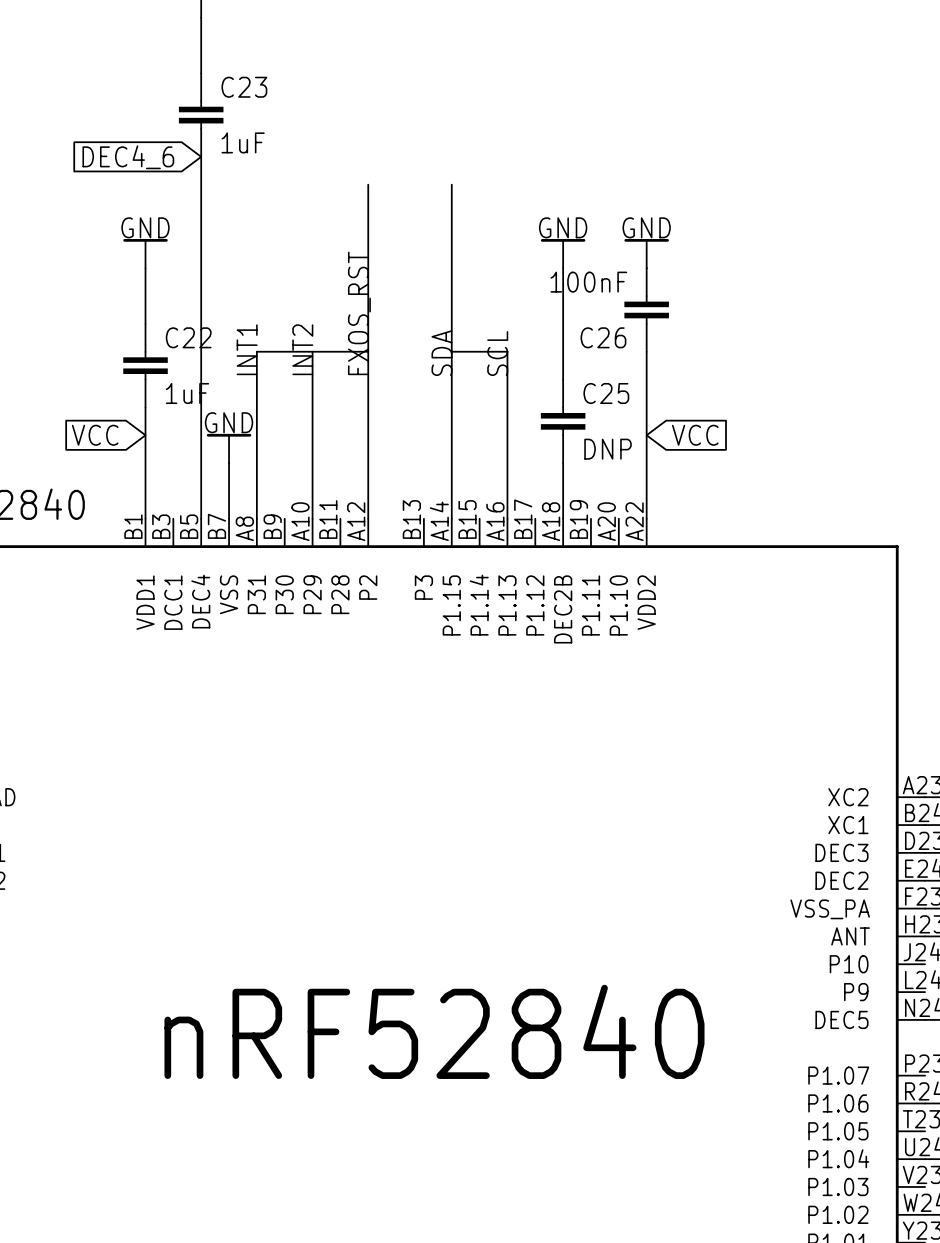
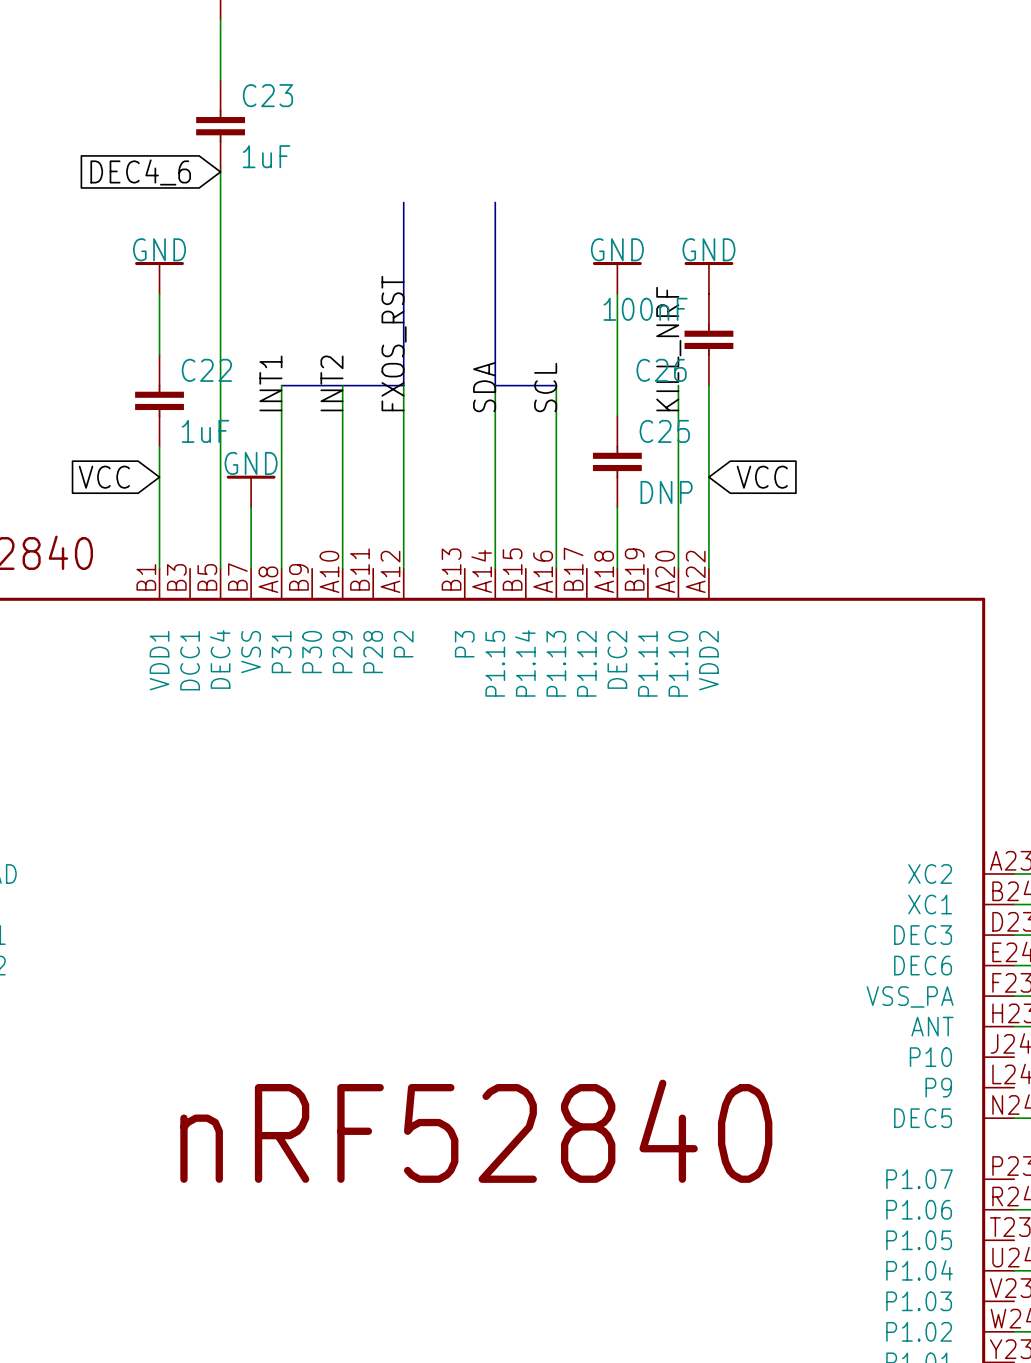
label: none -> KILL_NRF (668, 349)
wire: none -> (678, 385) (678, 568)
part pin name: DEC2B (563, 609) -> DEC2 (617, 659)
part pin name: DEC2 (841, 880) -> DEC6 (923, 965)

